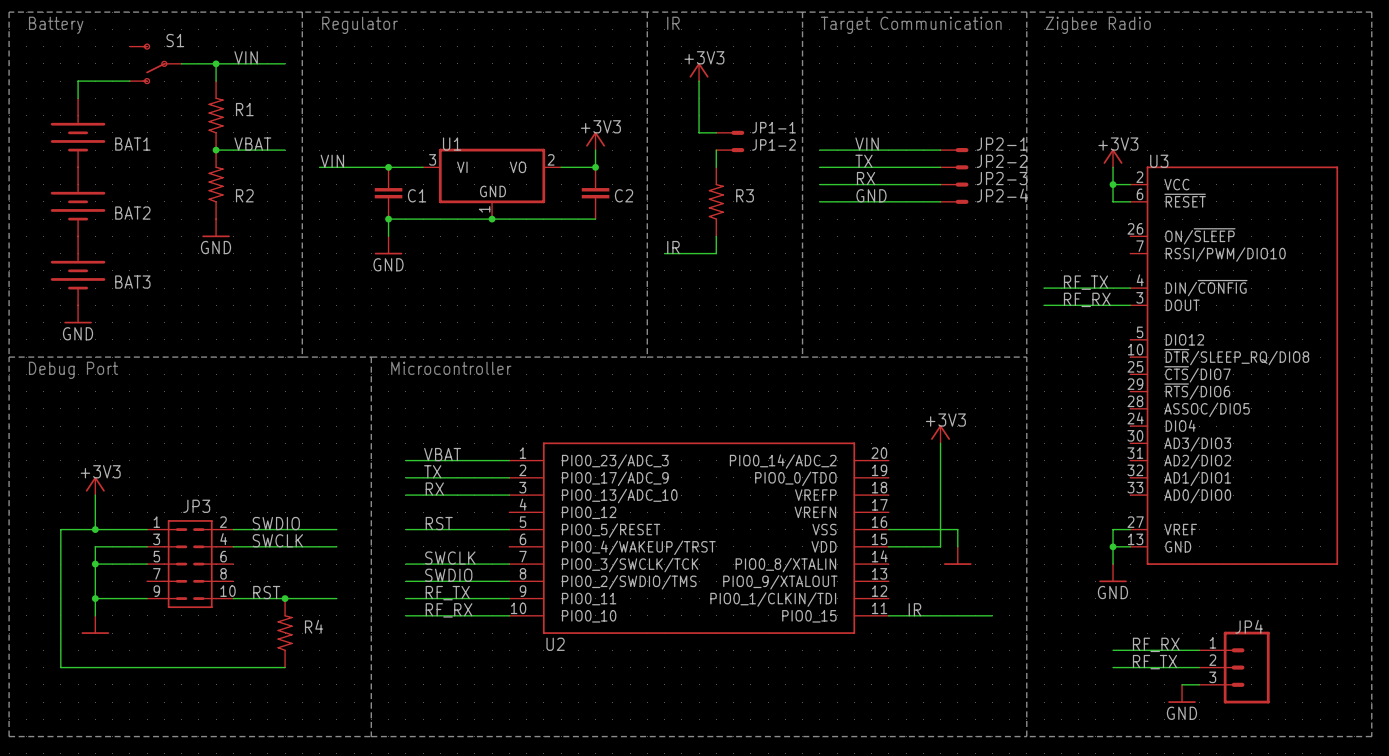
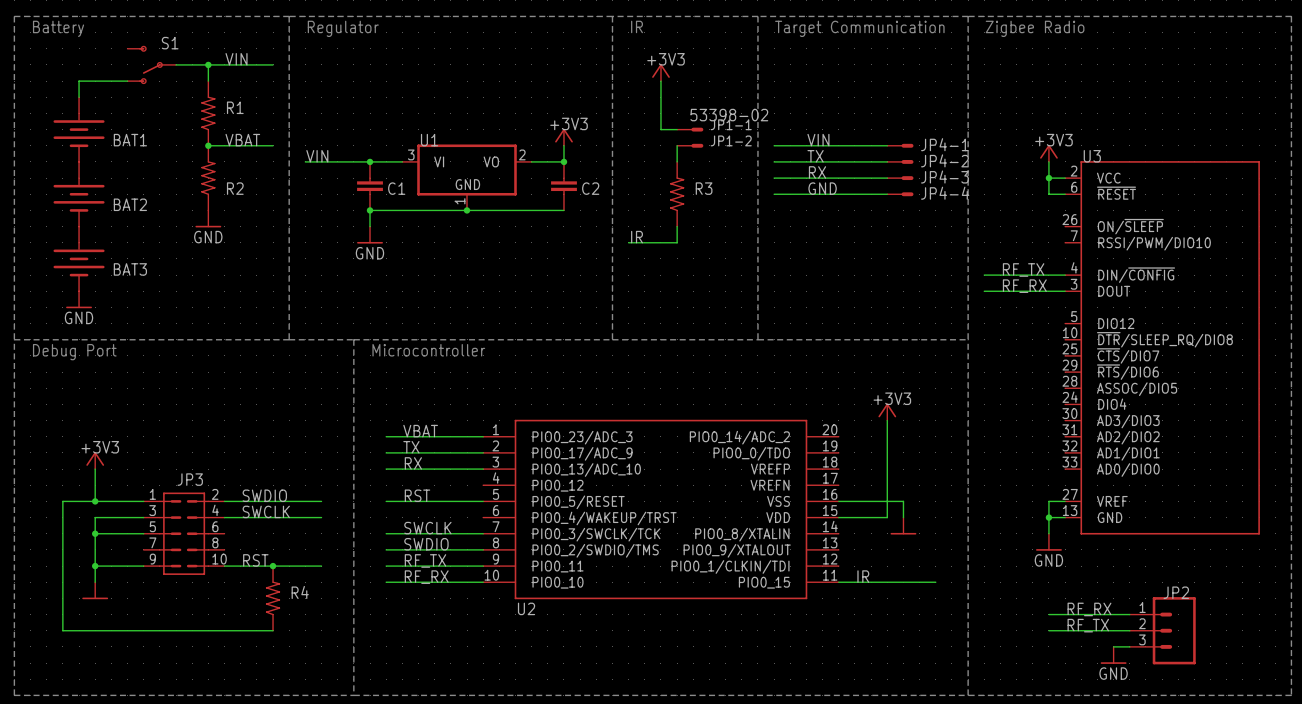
JP1-1 value: none -> 53398-02 (729, 115)
JP2-1 name: JP2-1 (1002, 144) -> JP4-1 (944, 144)
JP2-2 name: JP2-2 (1002, 161) -> JP4-2 (944, 160)
JP2-3 name: JP2-3 (1002, 178) -> JP4-3 (944, 177)
JP2-4 name: JP2-4 (1002, 195) -> JP4-4 (945, 193)
JP4 name: JP4 (1249, 626) -> JP2 (1176, 592)

